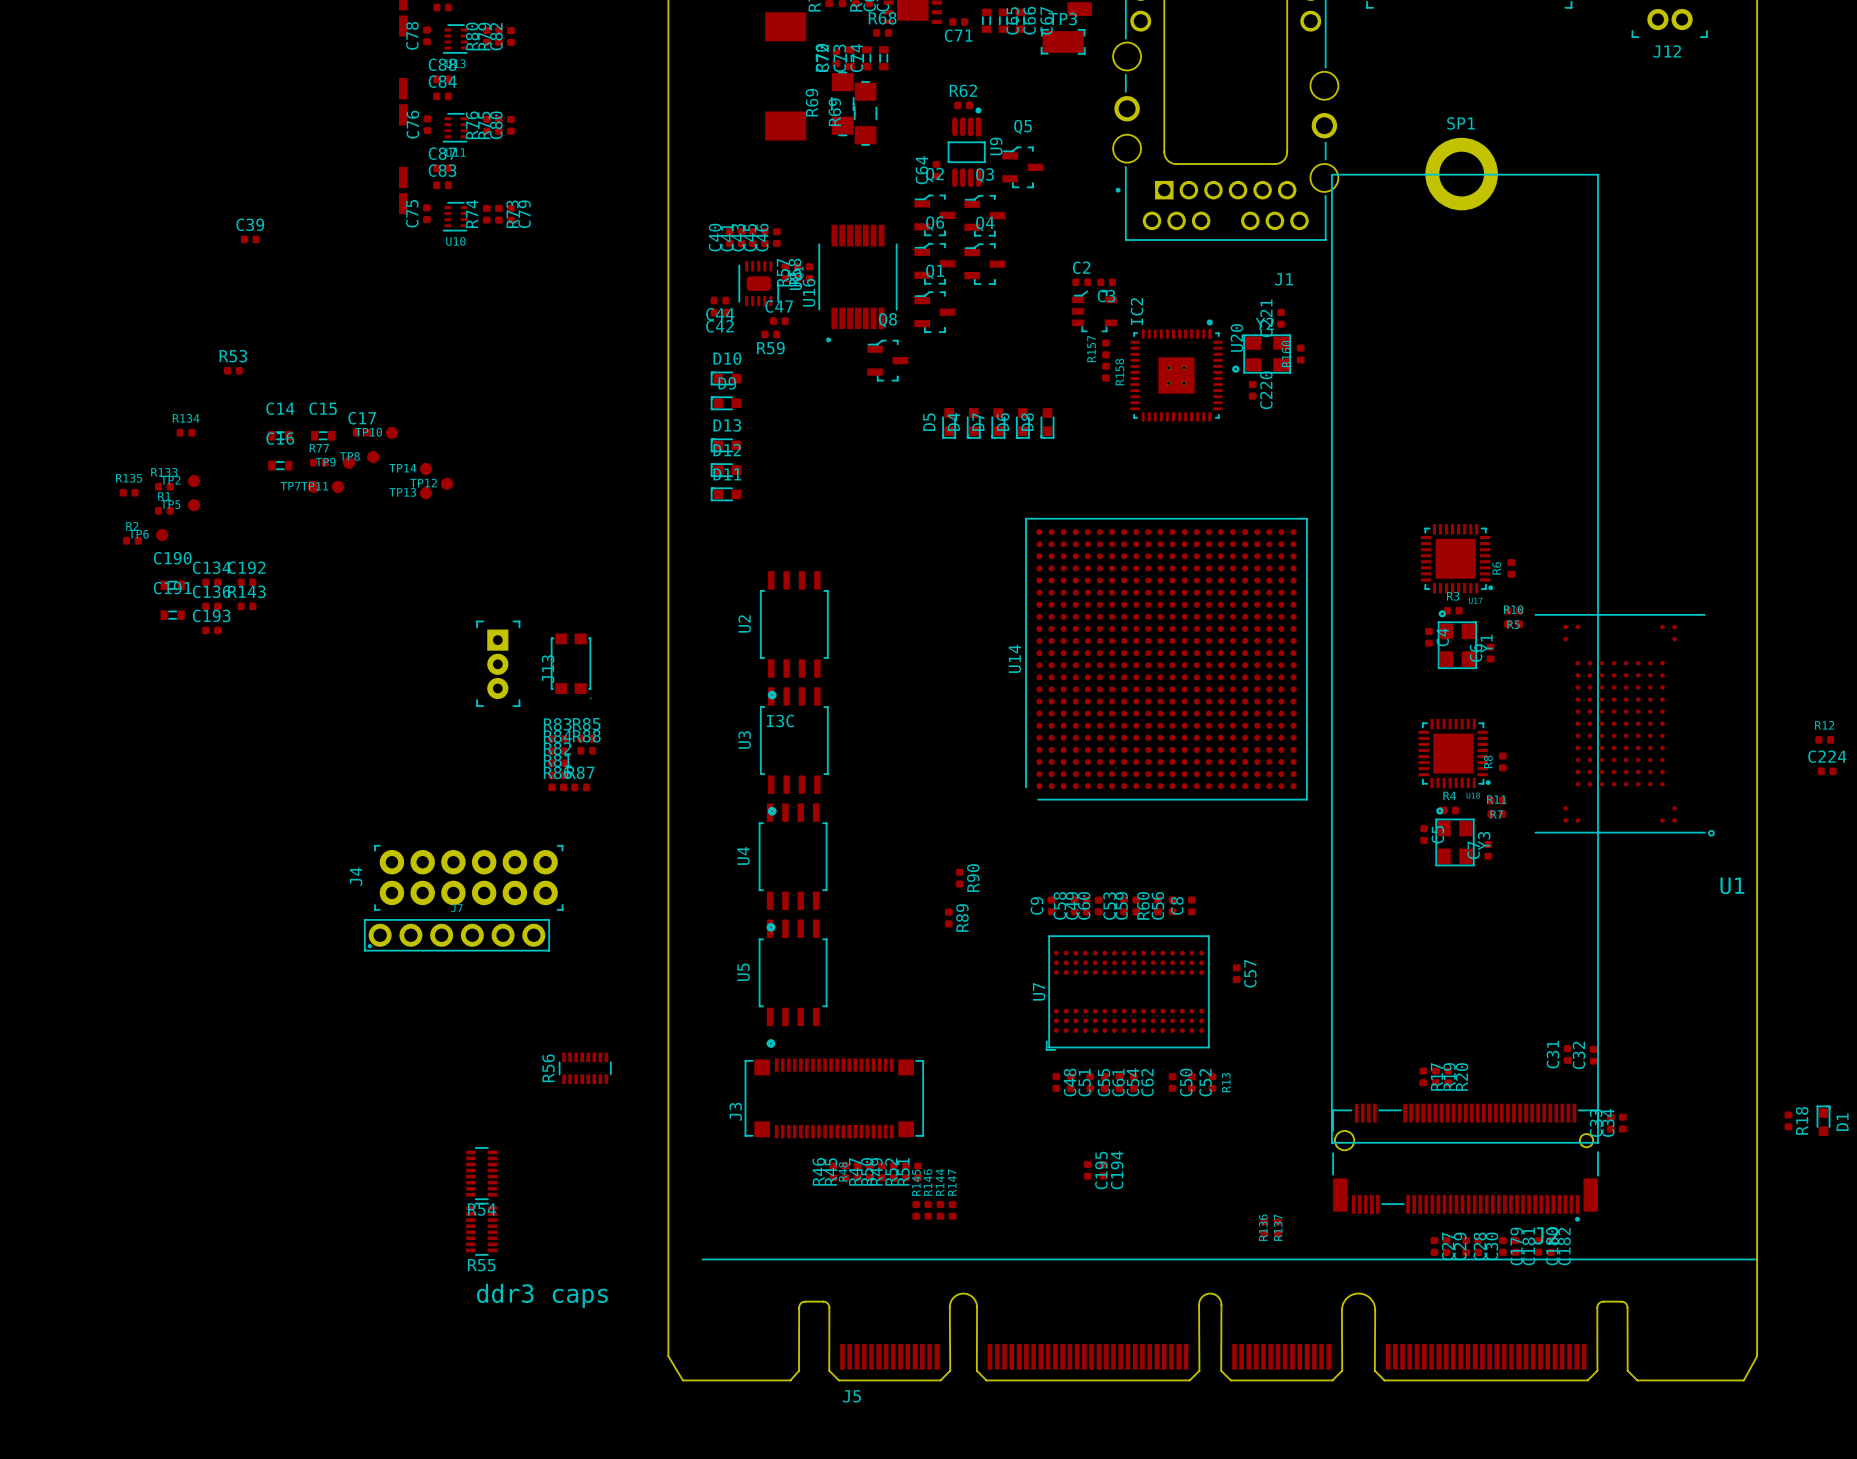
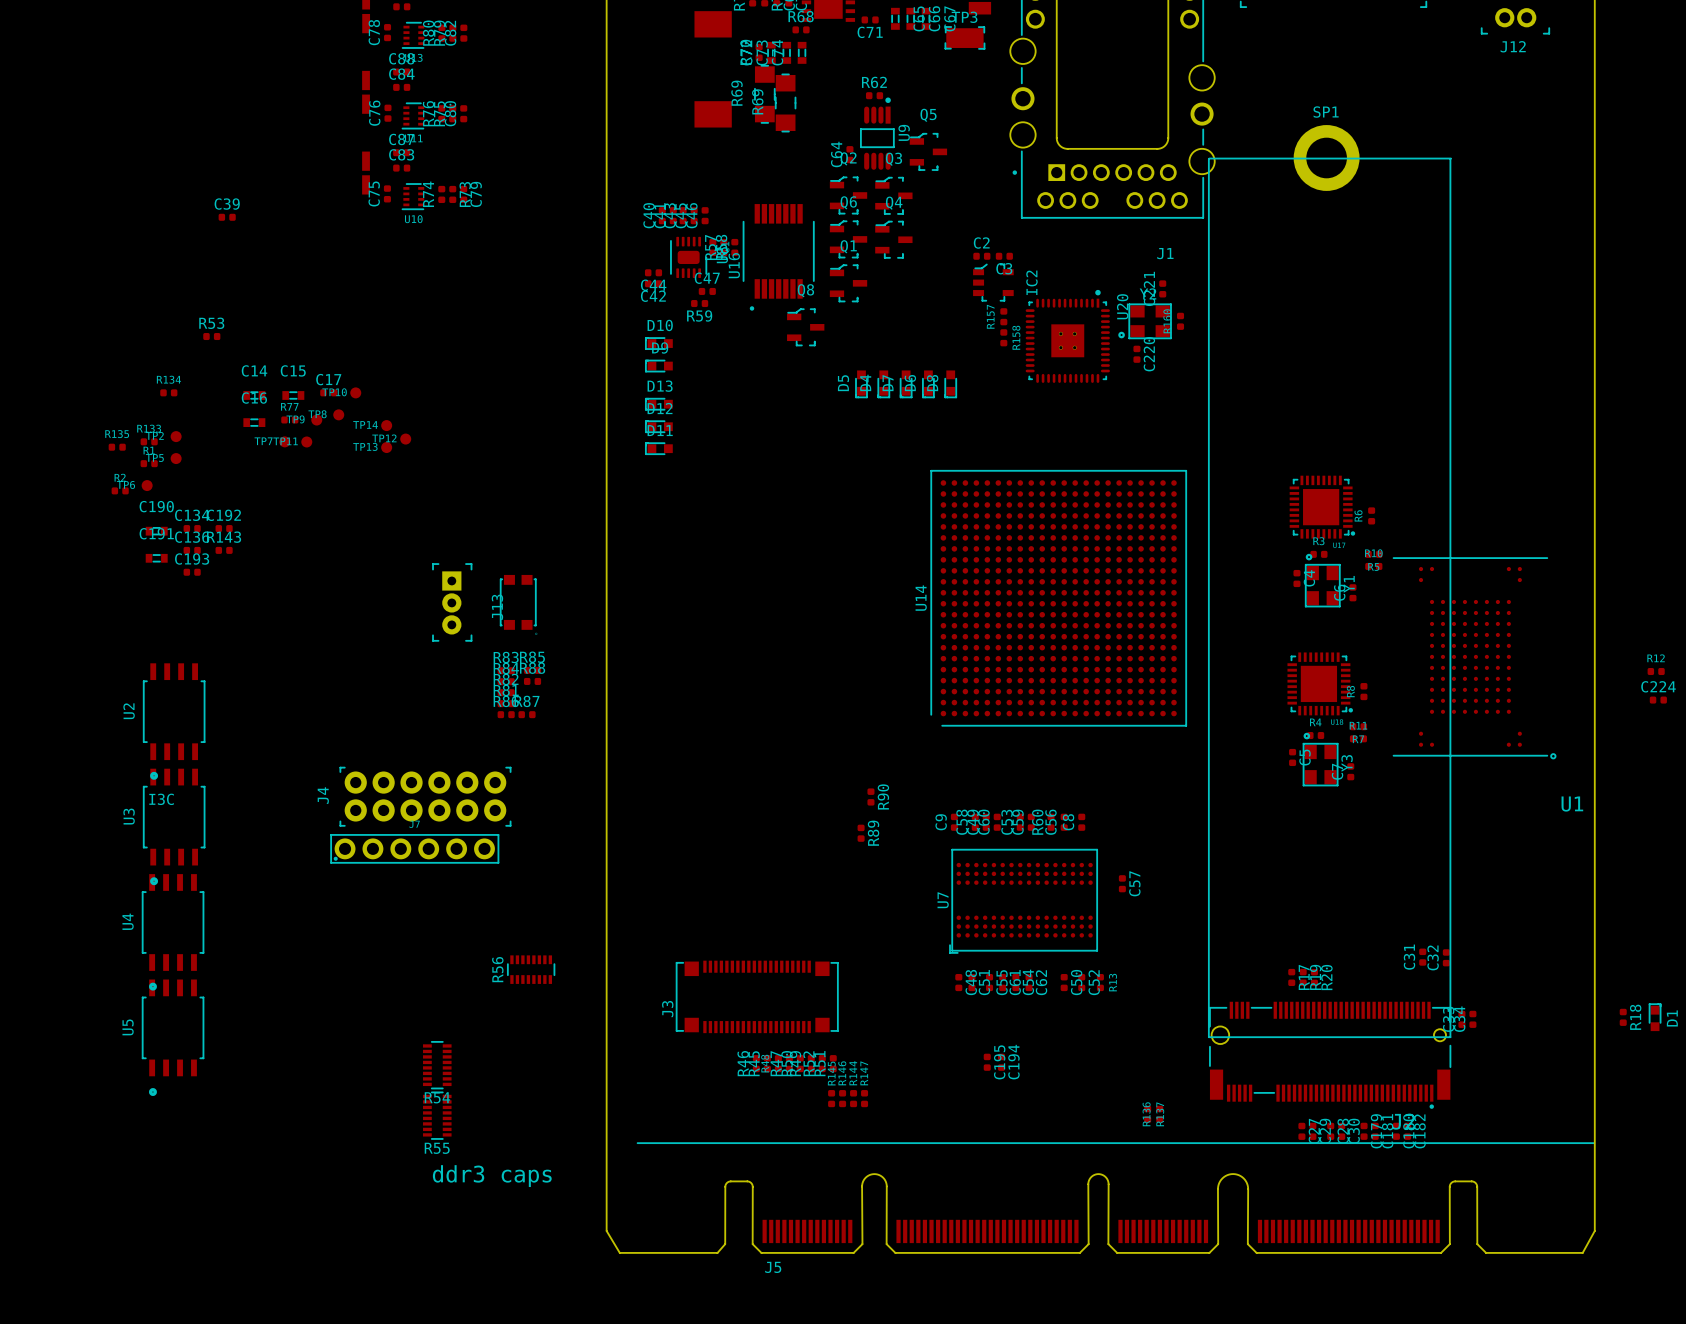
U2 position: (794, 635) -> (174, 721)
text: I3C (780, 721) -> none
U3 position: (794, 751) -> (174, 826)
U4 position: (793, 867) -> (173, 932)
text: none -> I3C (161, 799)
U5 position: (793, 983) -> (173, 1037)

